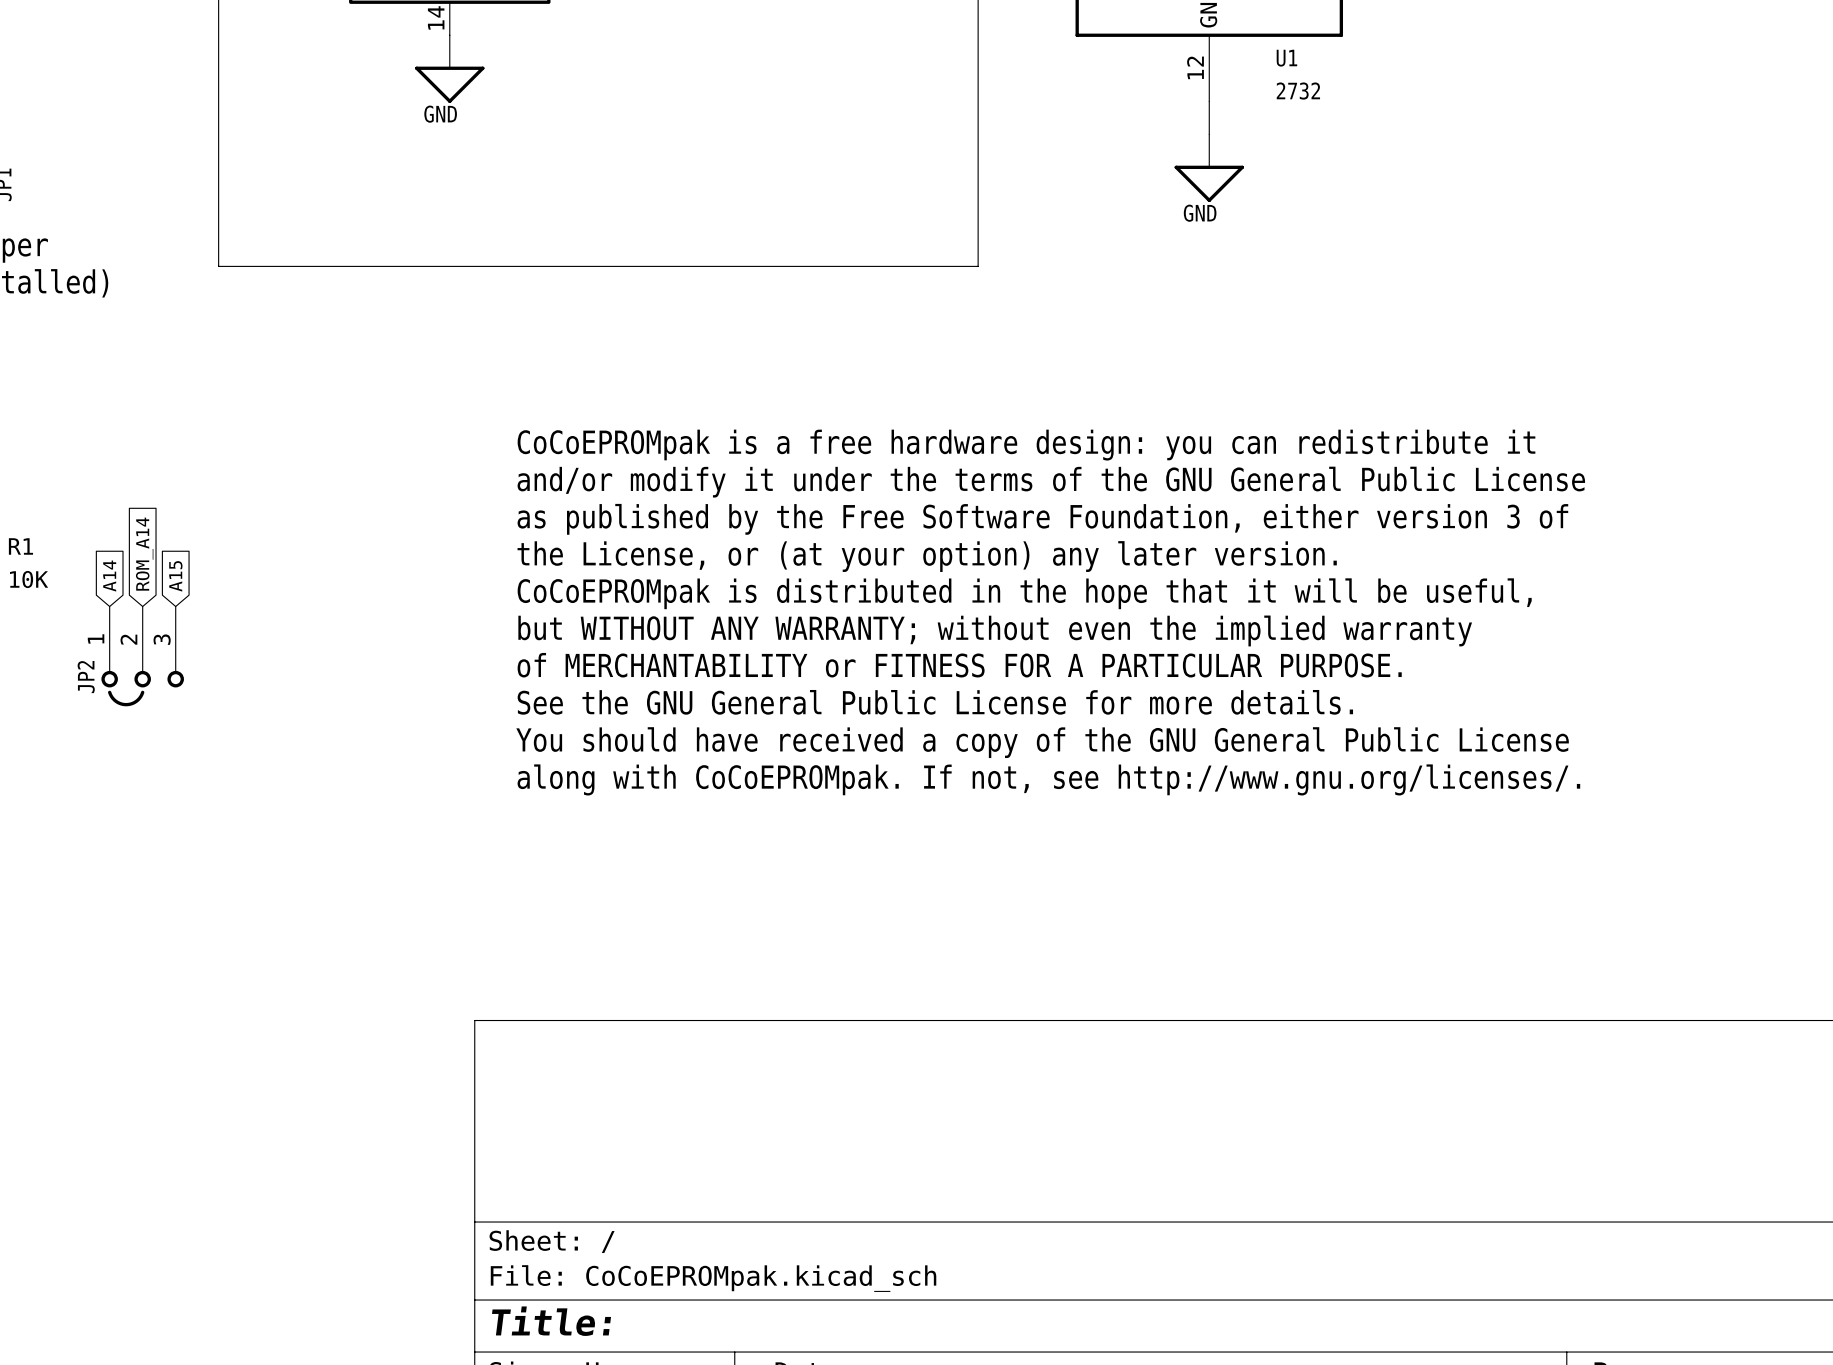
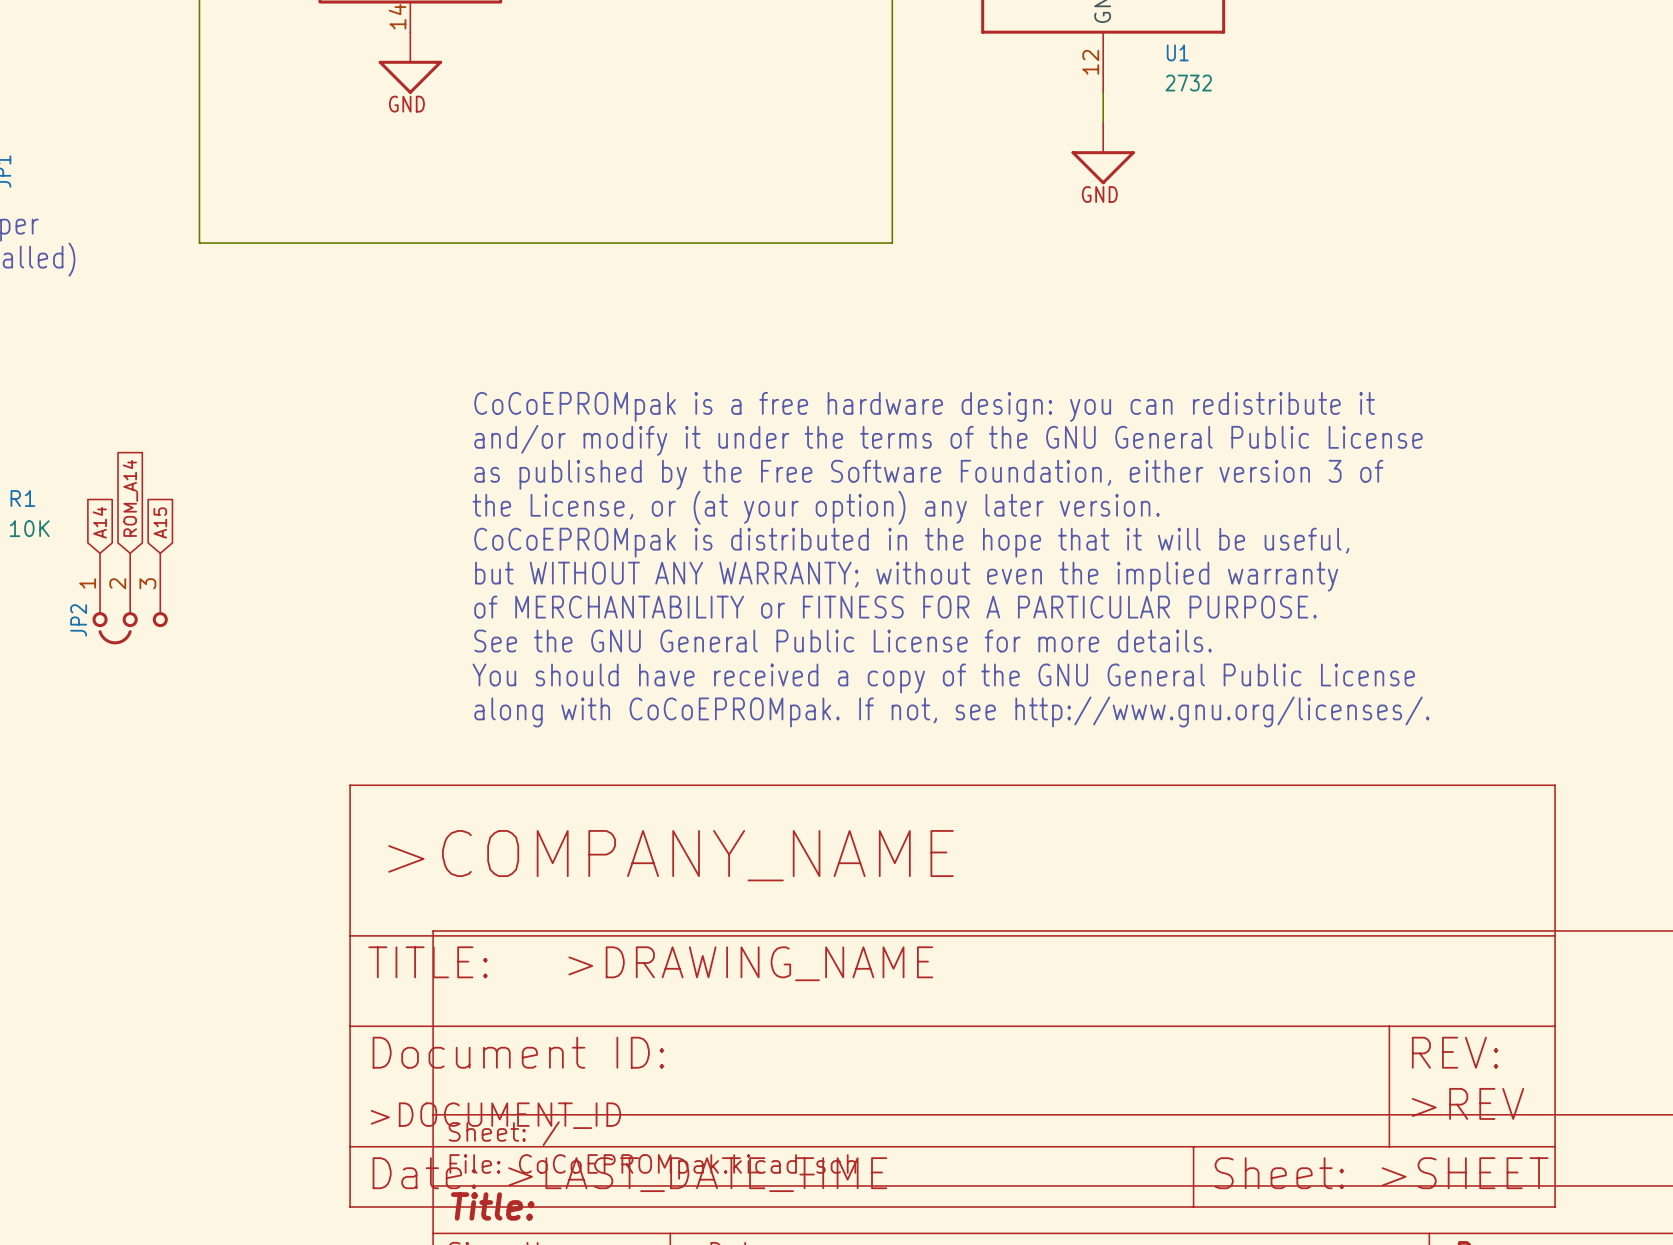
power symbol: none -> (952, 996)

